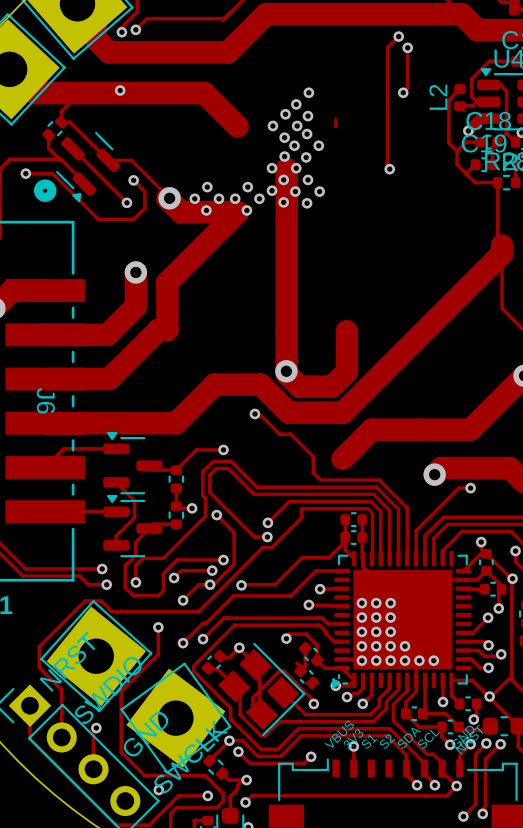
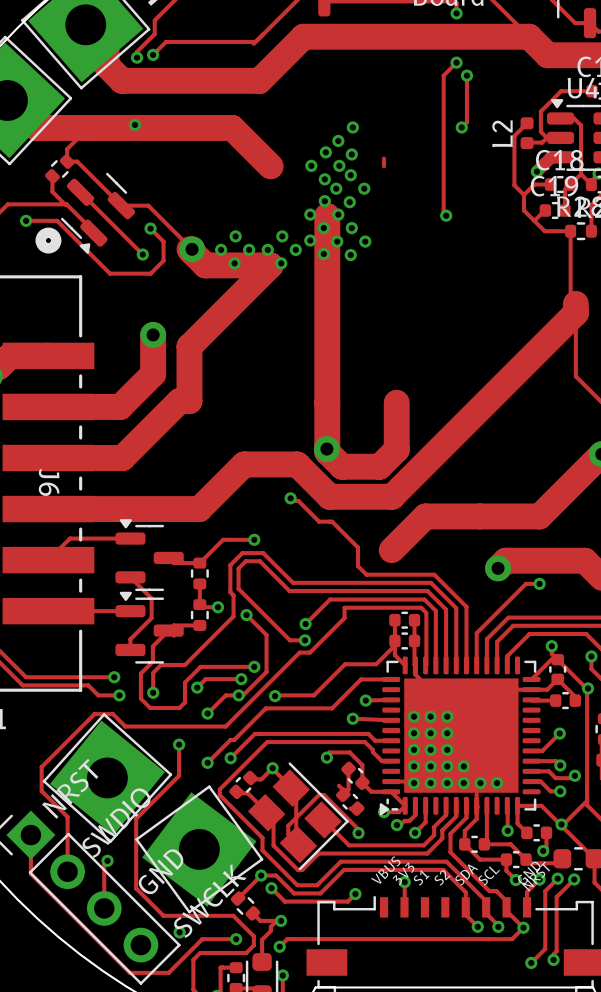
track: (501, 589) (498, 592) (498, 608) -> none
via: (498, 608) -> none

